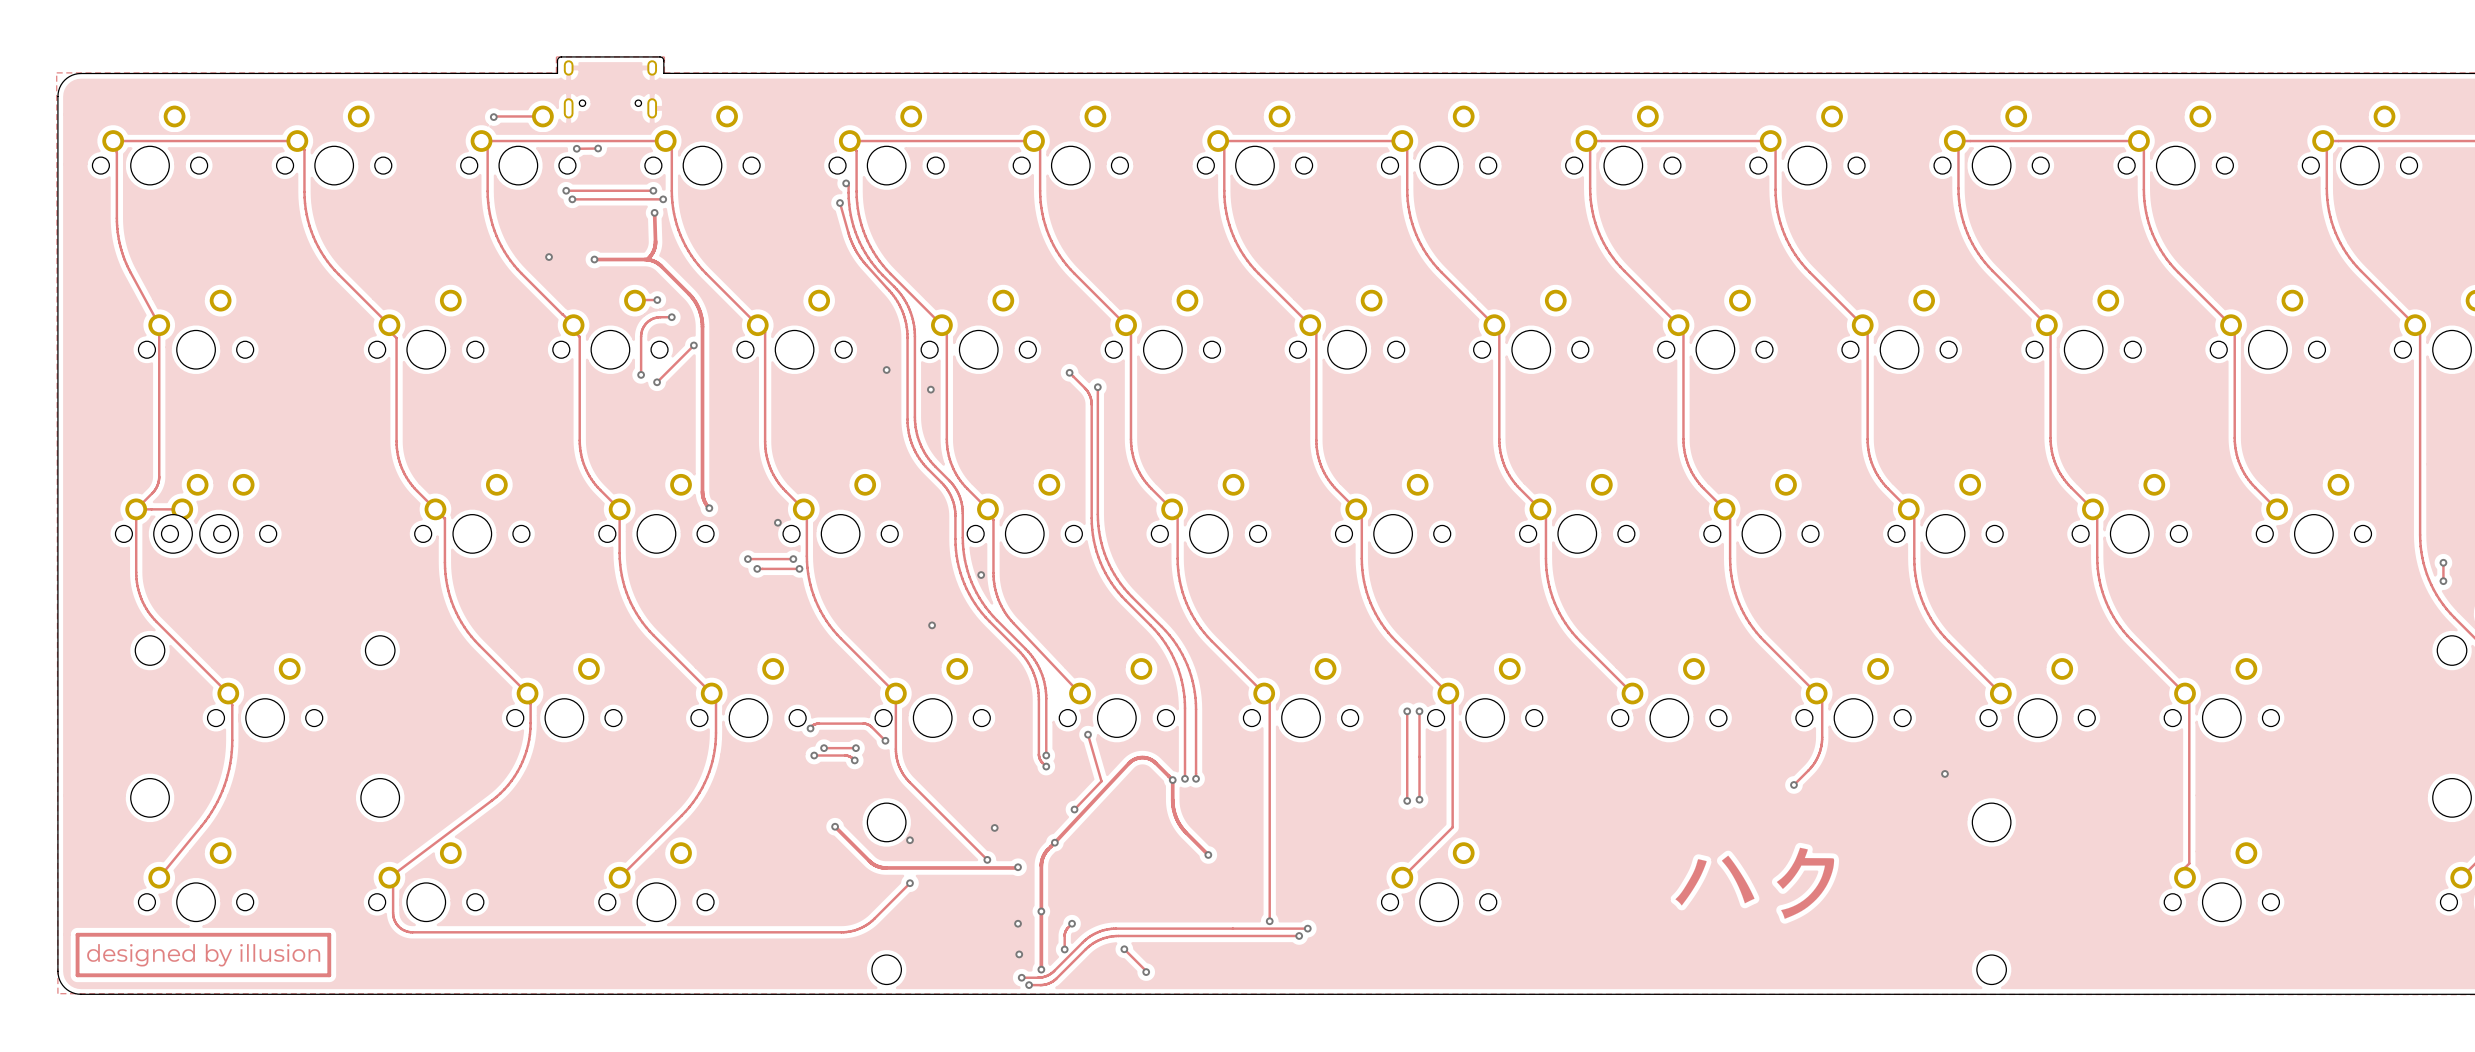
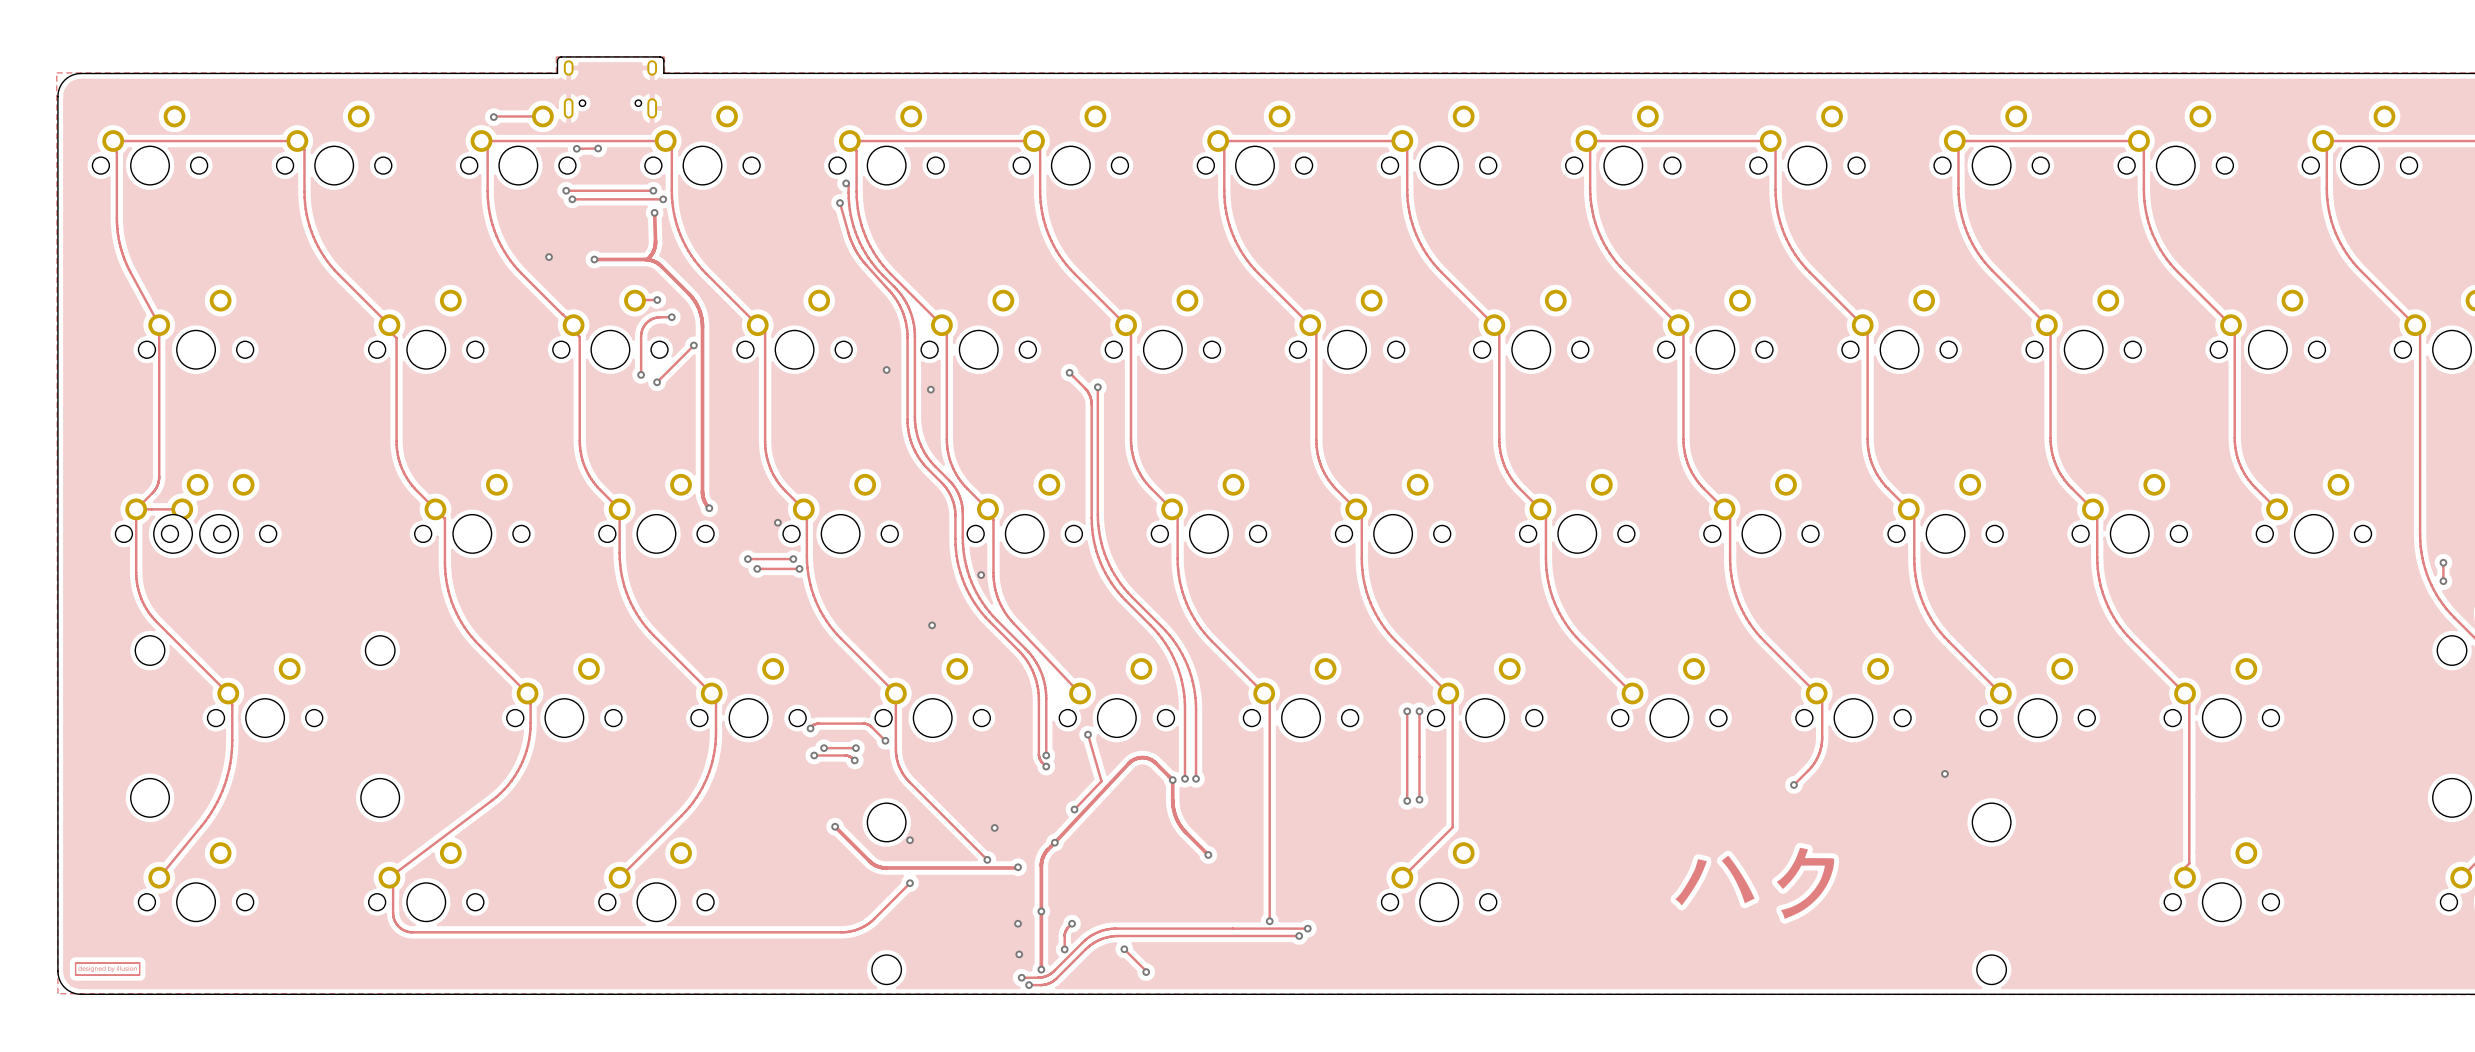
drawing: [75, 932, 332, 978] -> none
drawing: none -> [74, 962, 141, 976]

